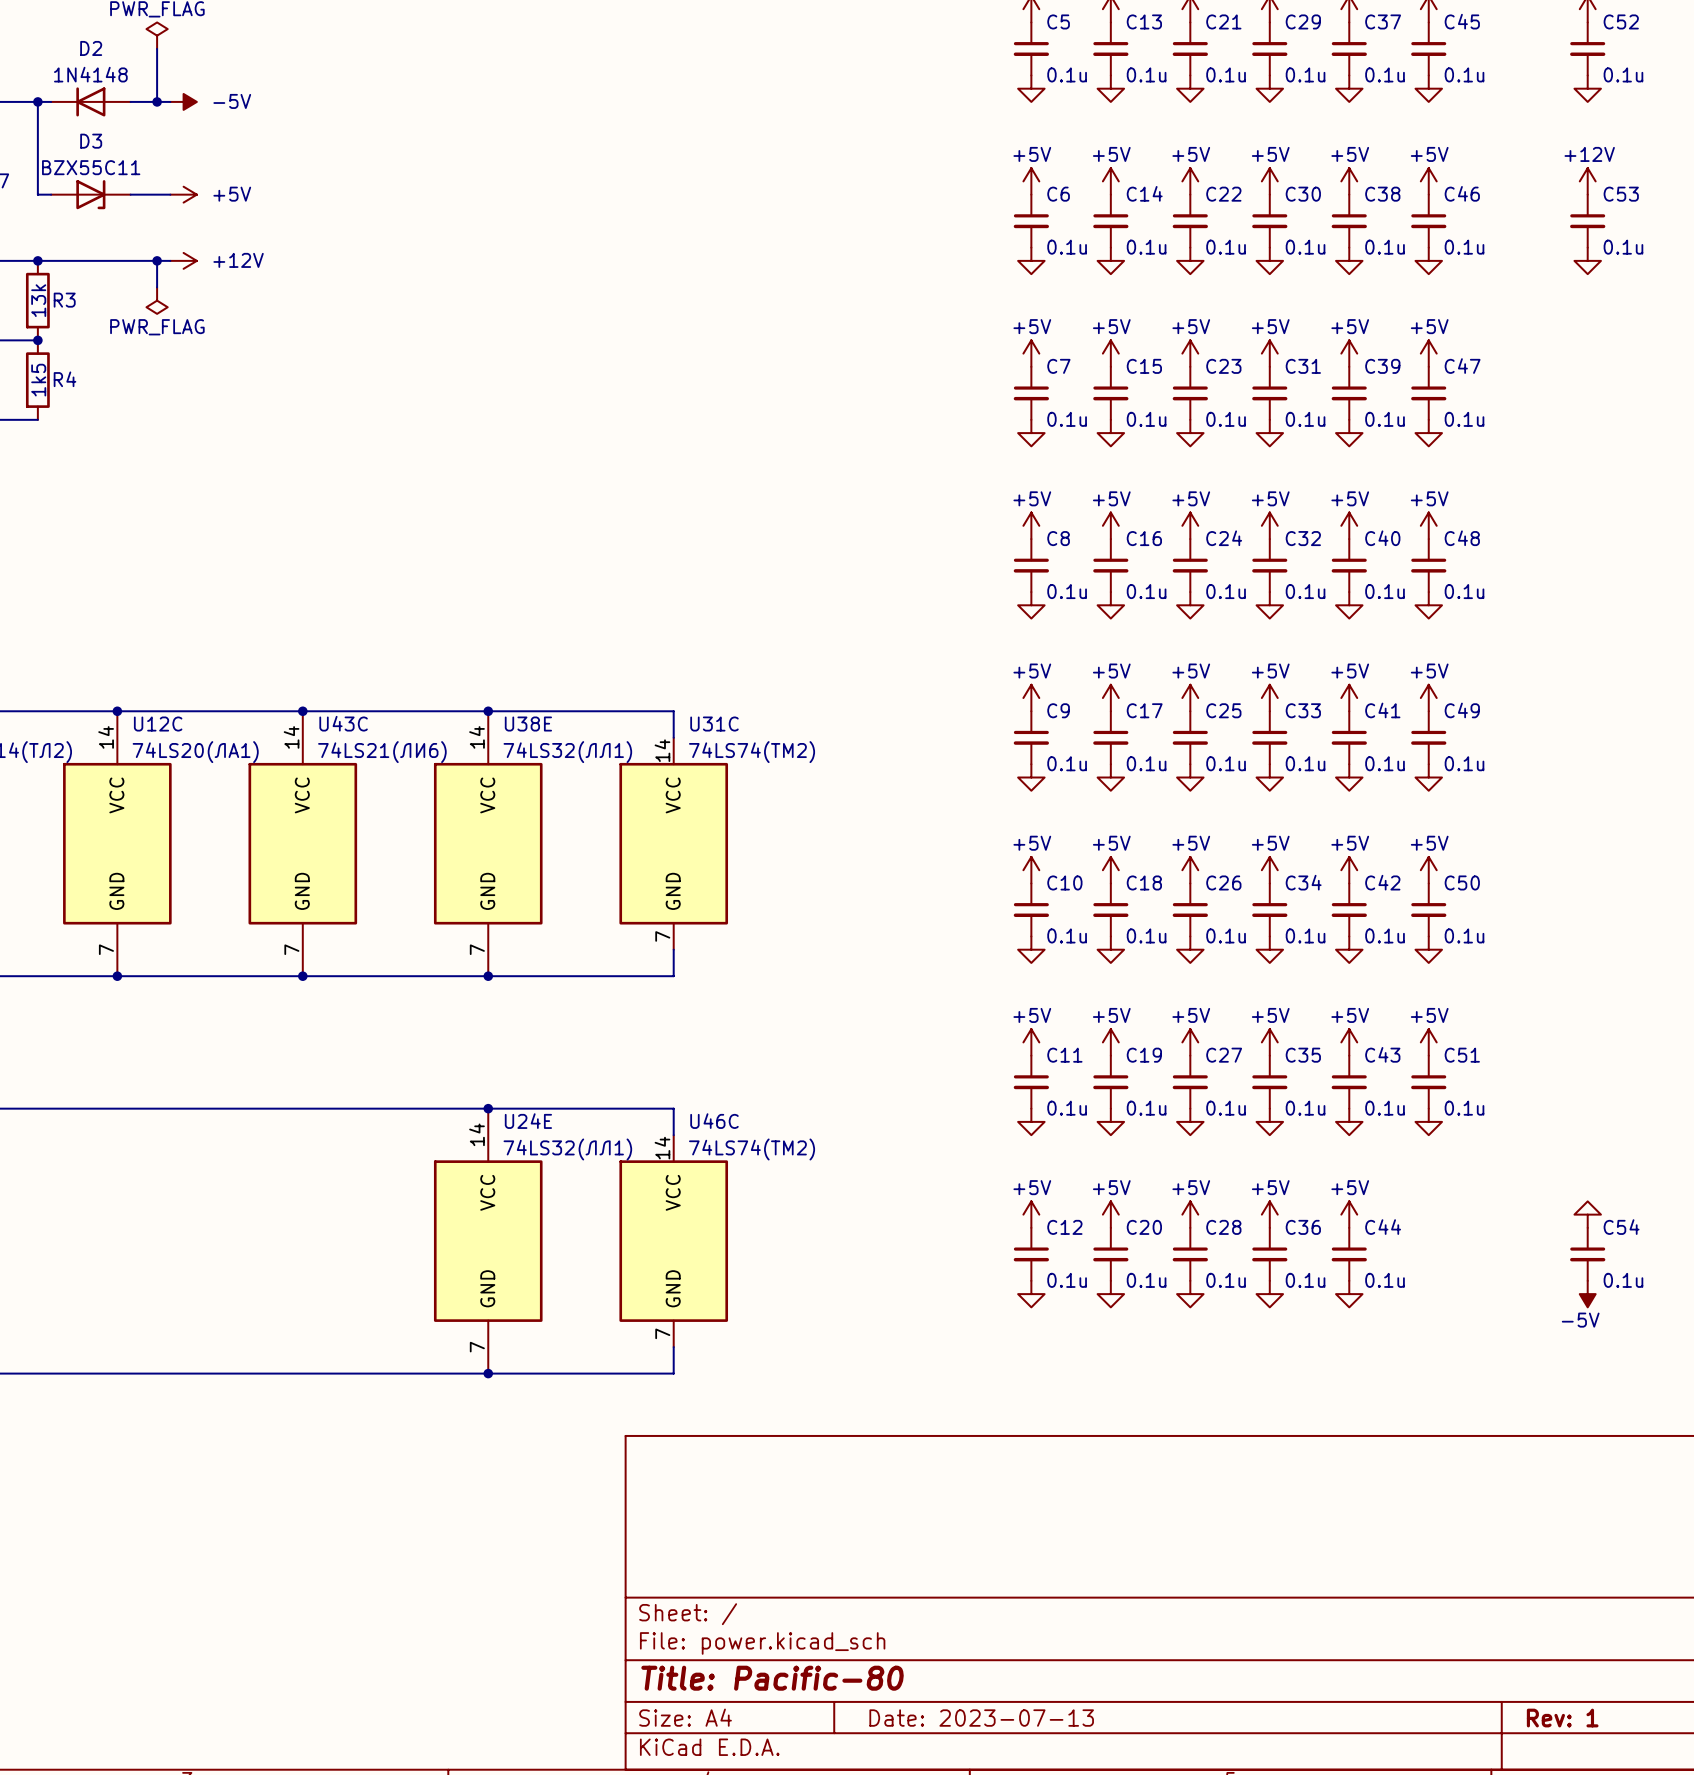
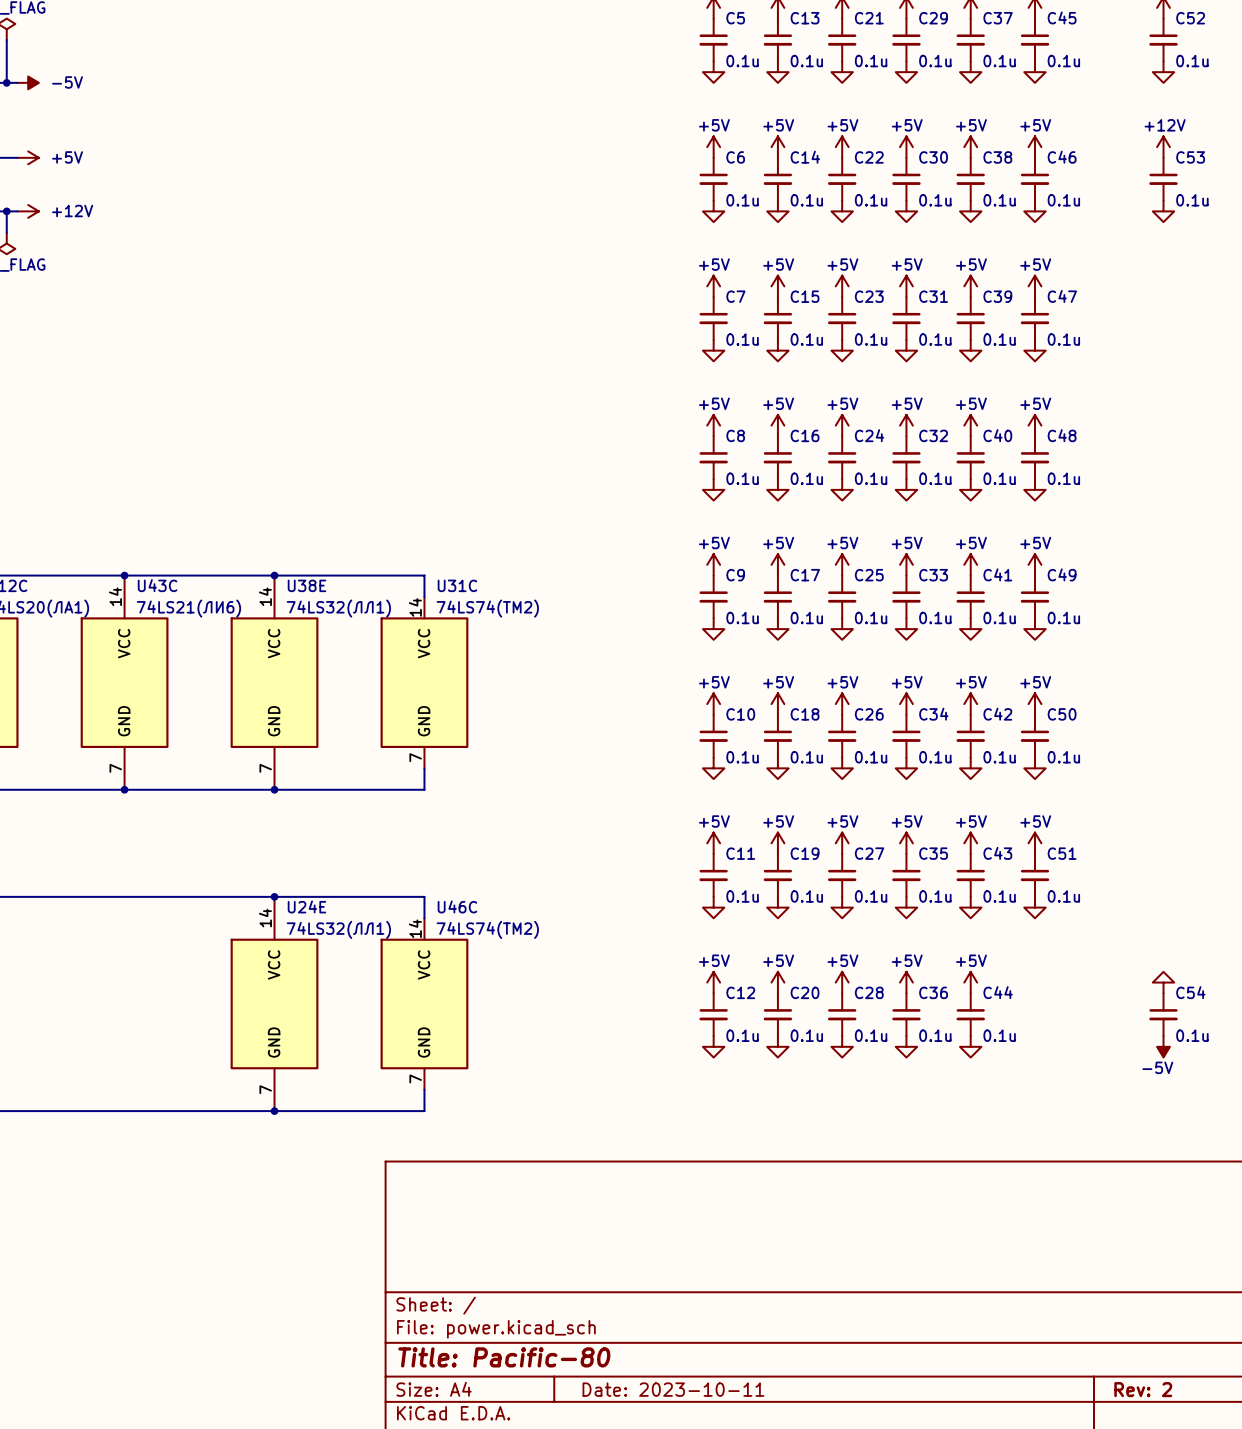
title block: Date: 2023-07-13 (981, 1718) -> Date: 2023-10-11 (673, 1389)
title block: Rev: 1 (1562, 1718) -> Rev: 2 (1143, 1389)

